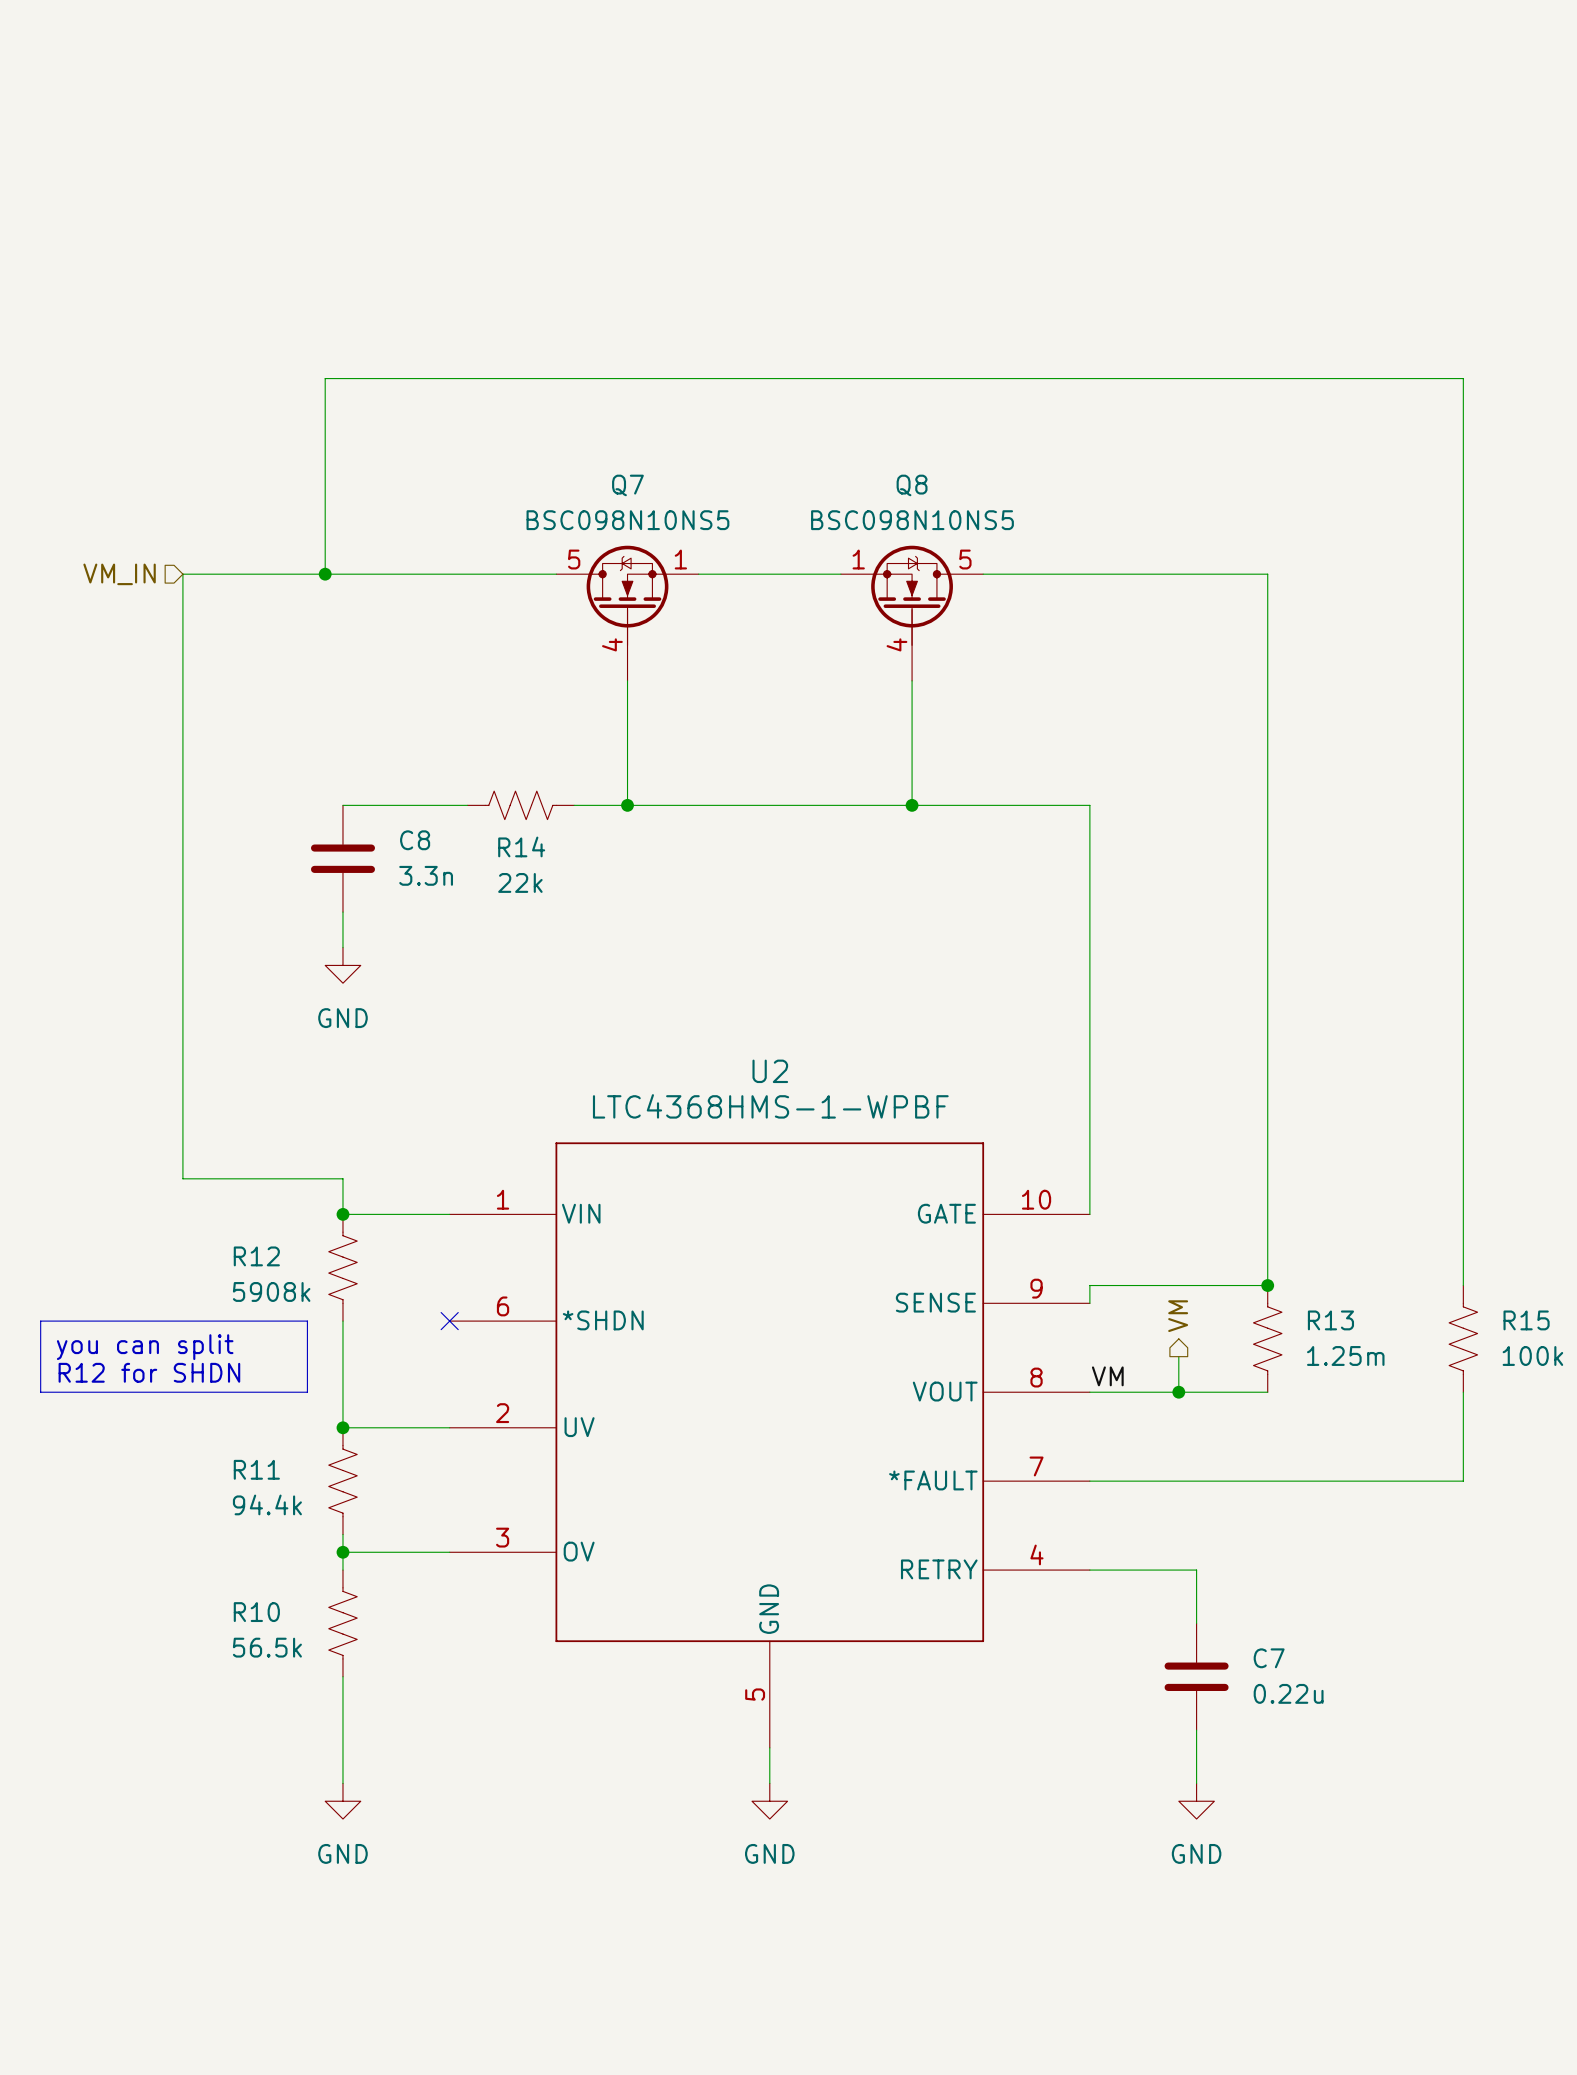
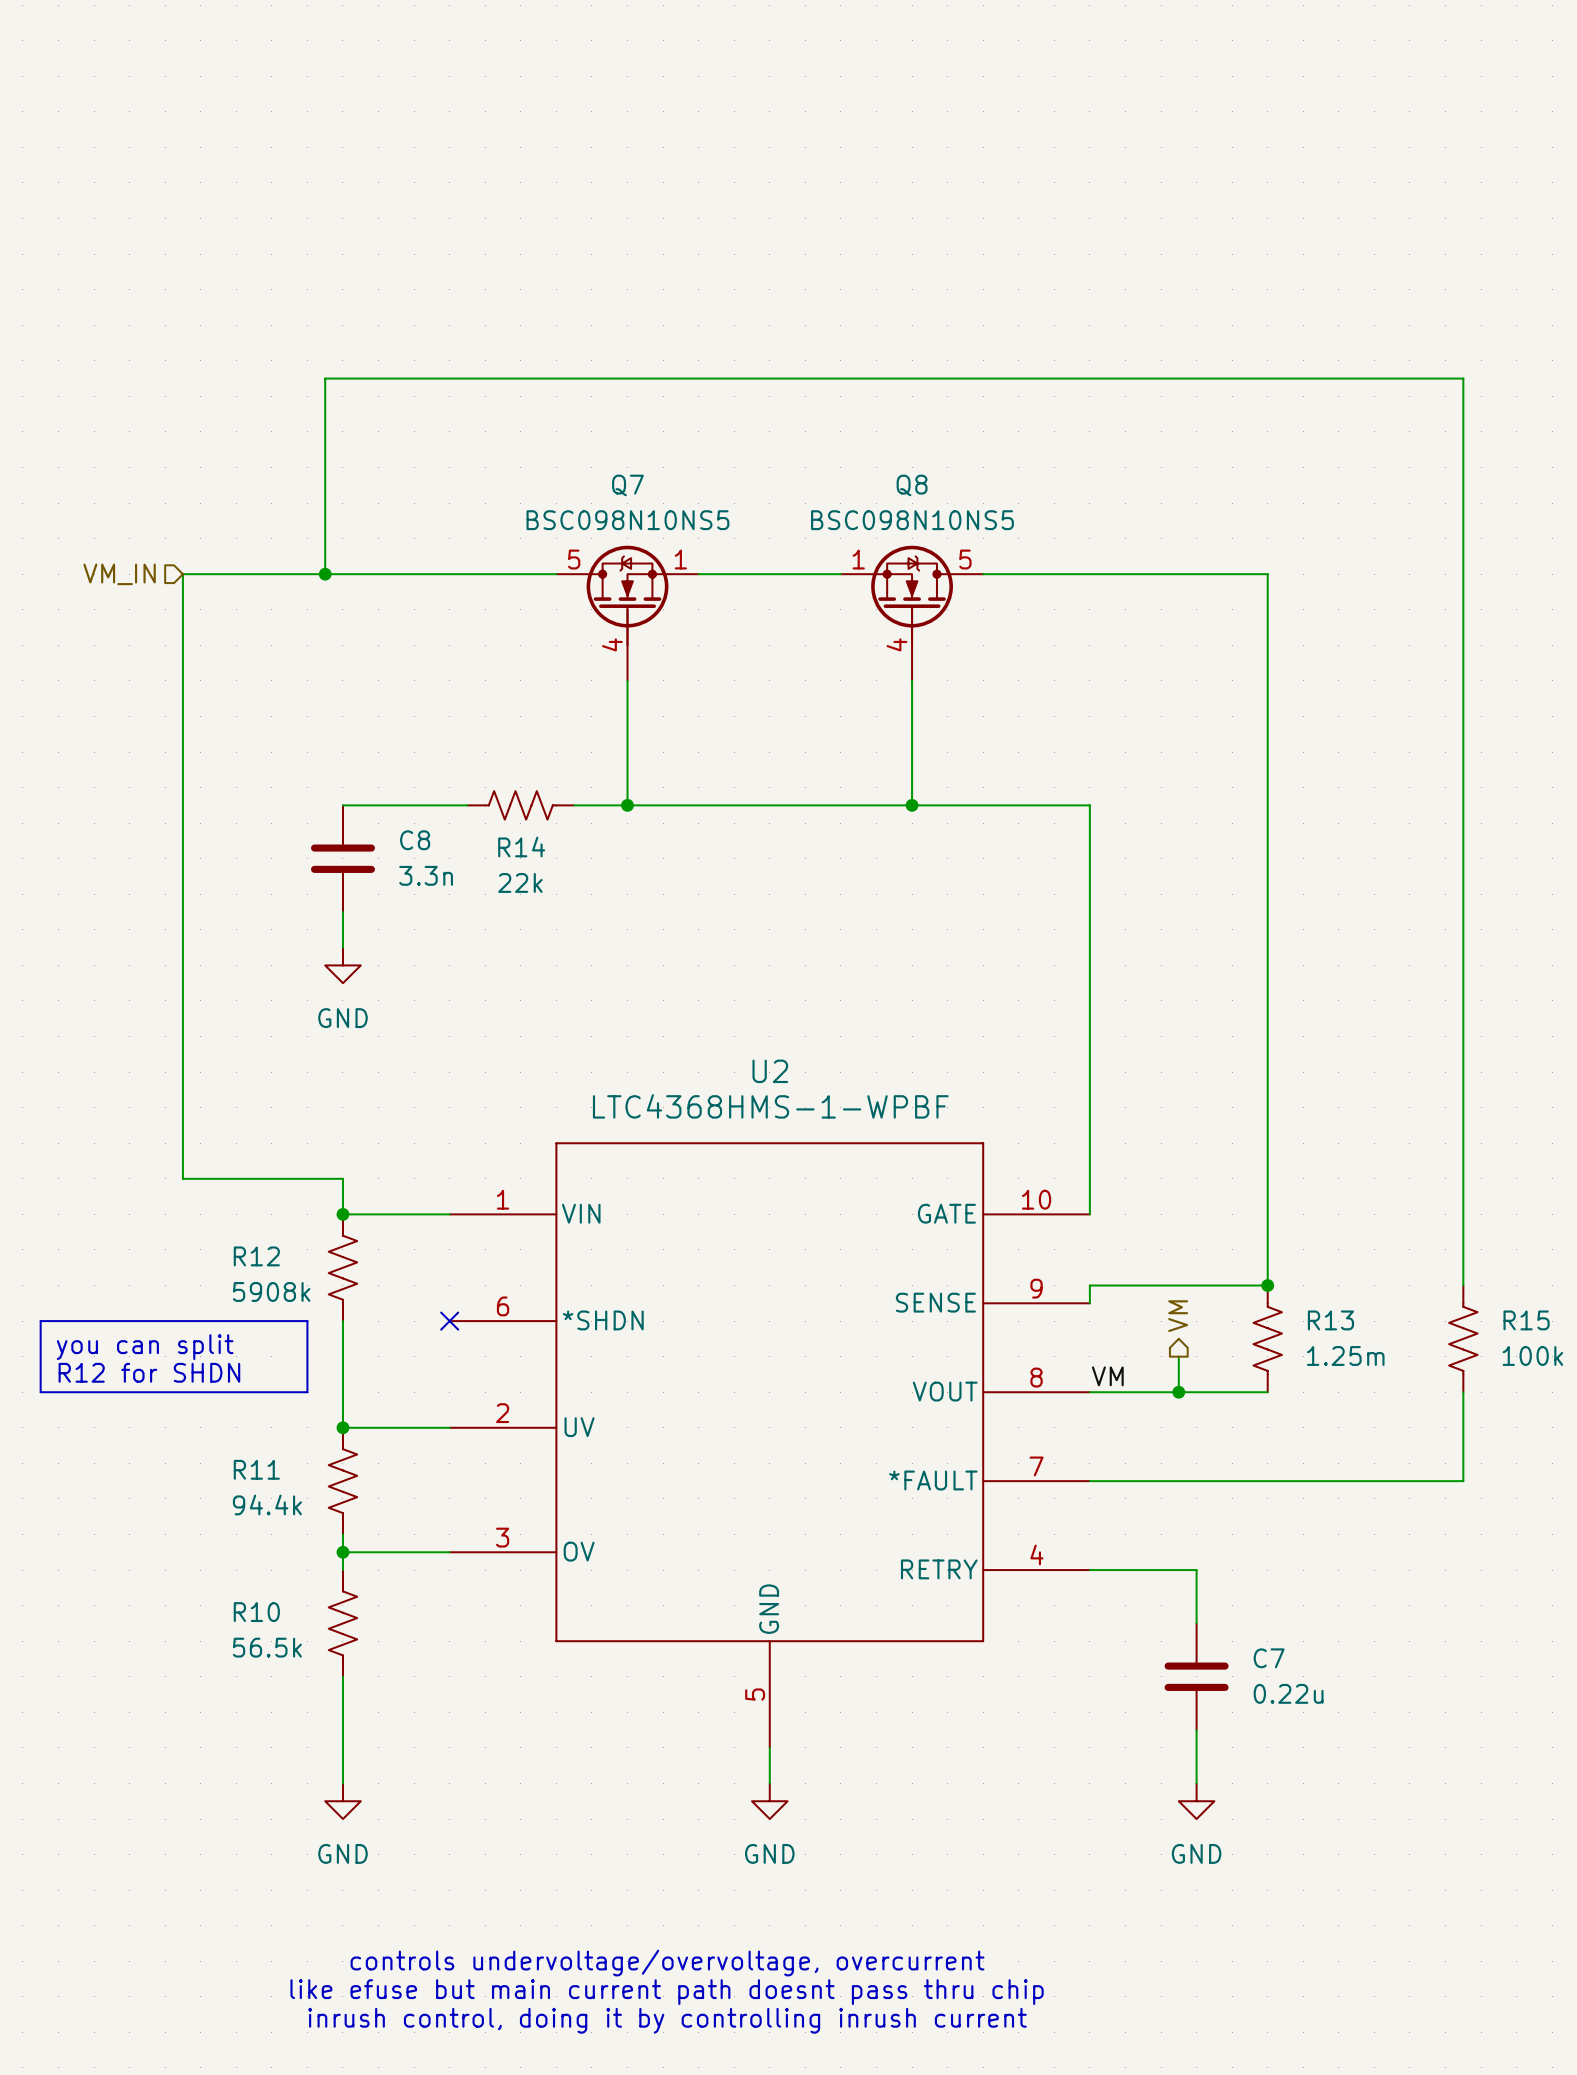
text: none -> controls undervoltage/overvoltage, overcurrent (667, 1963)
text: none -> like efuse but main current path doesnt pass thru chip (667, 1992)
text: none -> inrush control, doing it by controlling inrush current (667, 2020)

